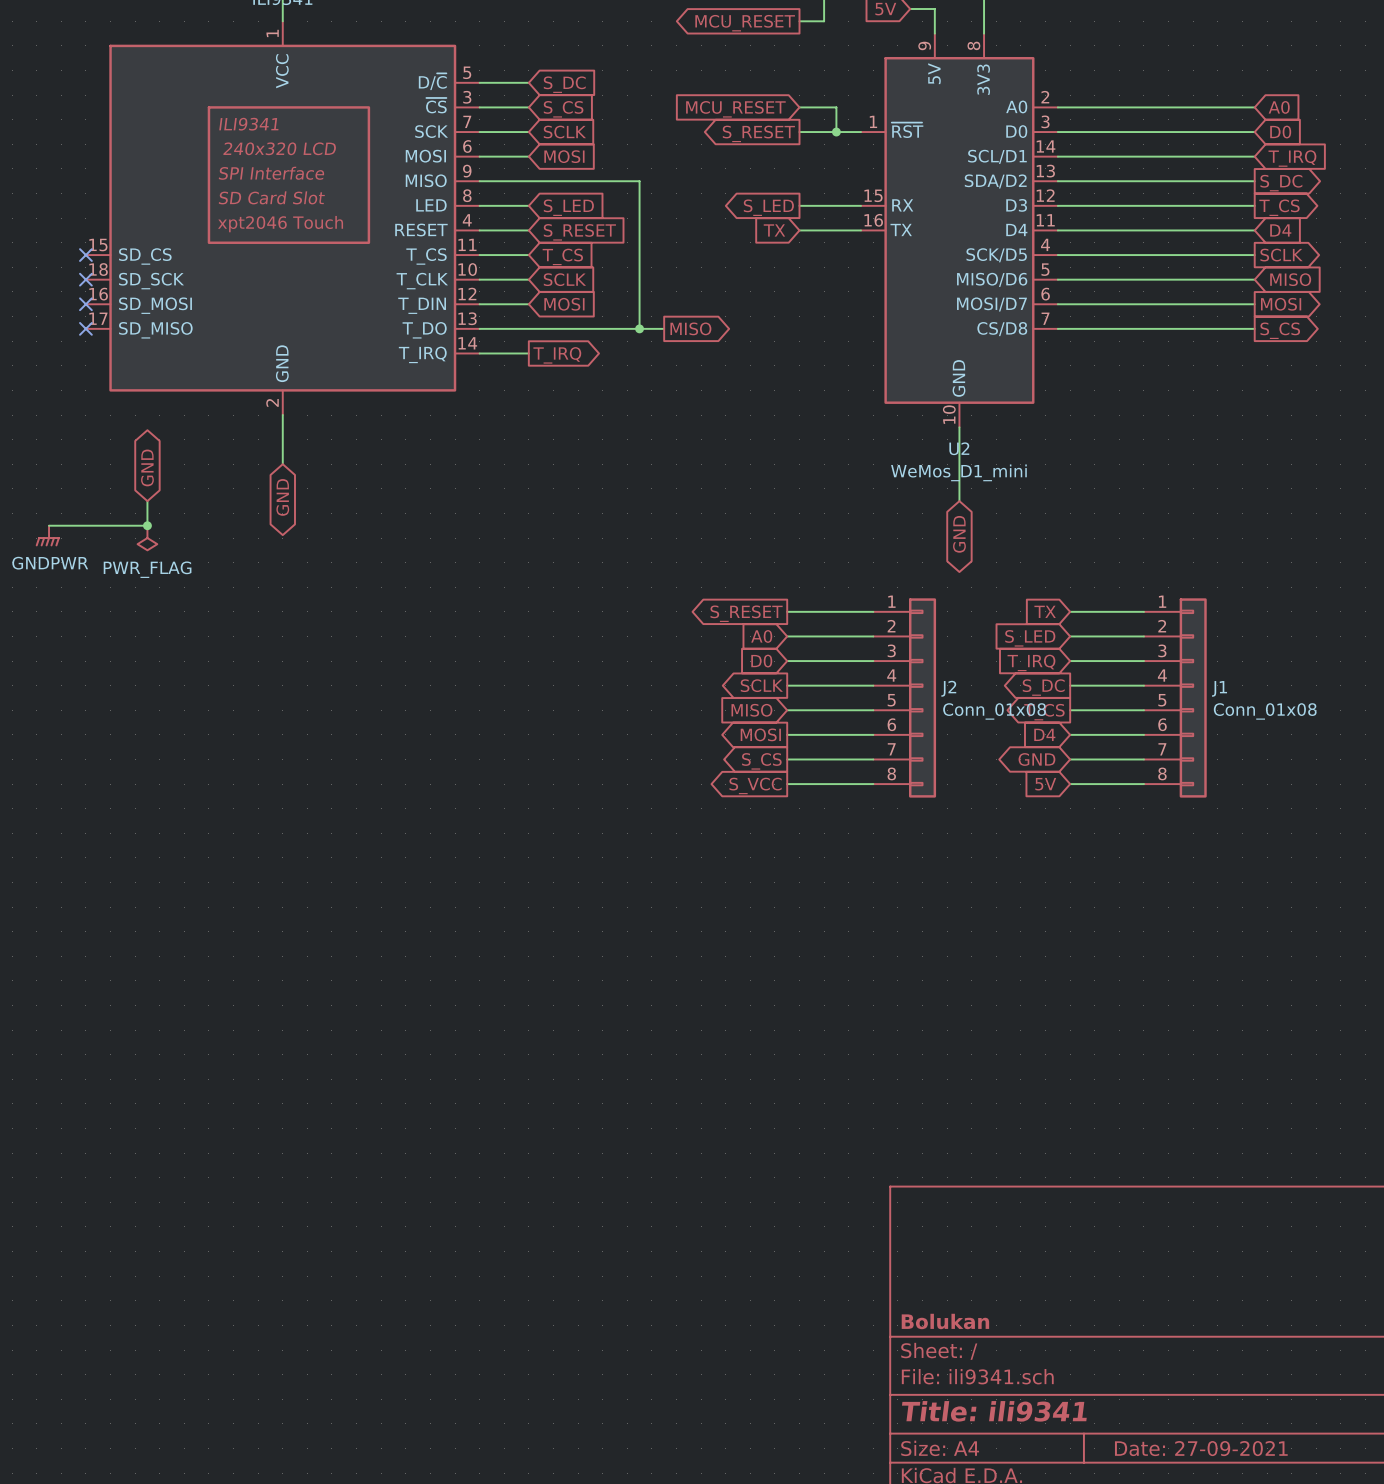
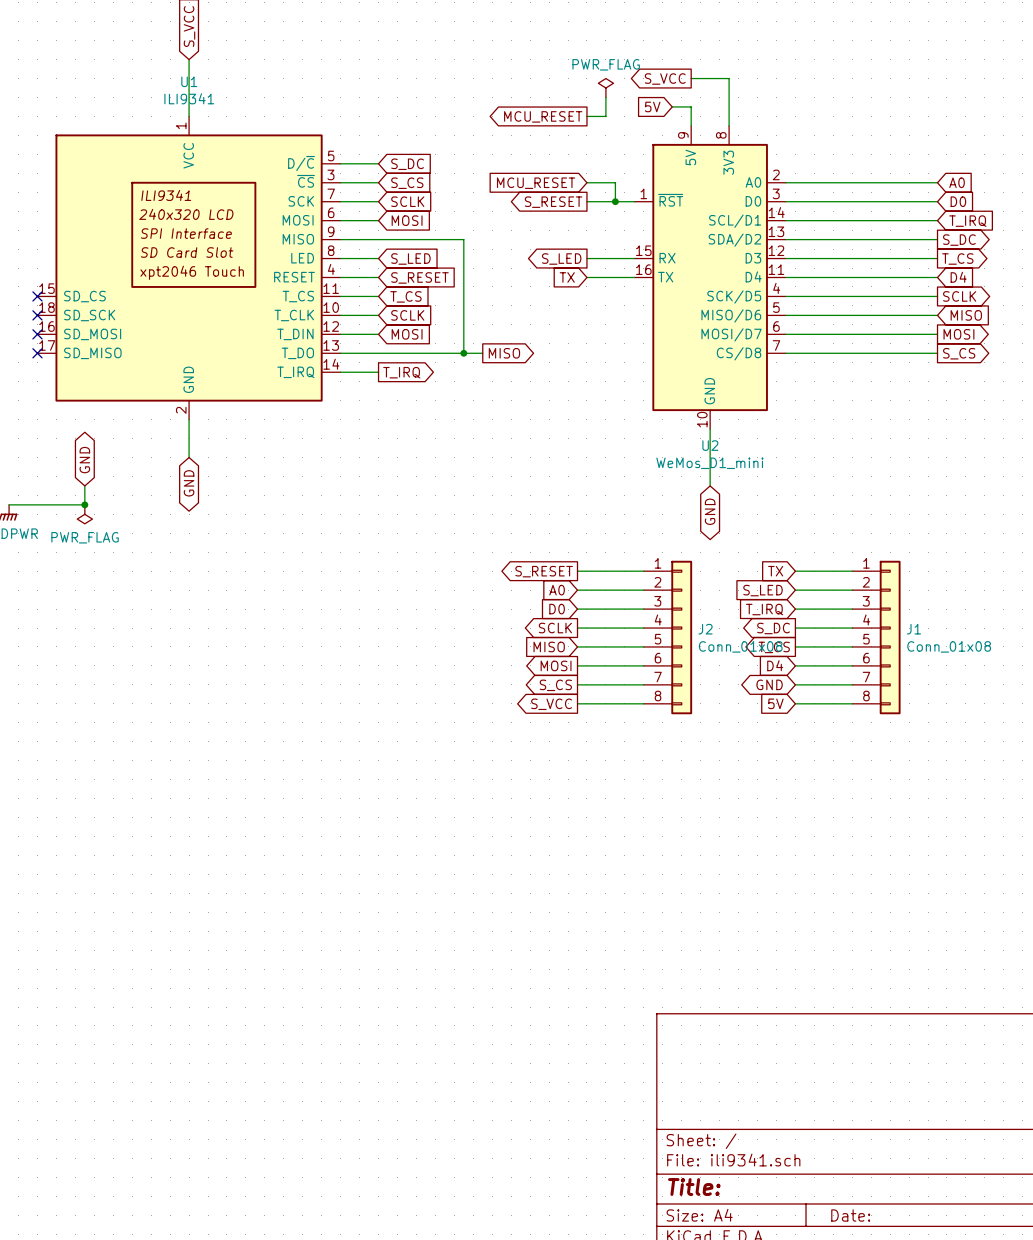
title block: Bolukan (945, 1321) -> none
title block: Title: ili9341 (994, 1411) -> Title: (694, 1187)
title block: Date: 27-09-2021 (1201, 1448) -> Date: (850, 1215)

